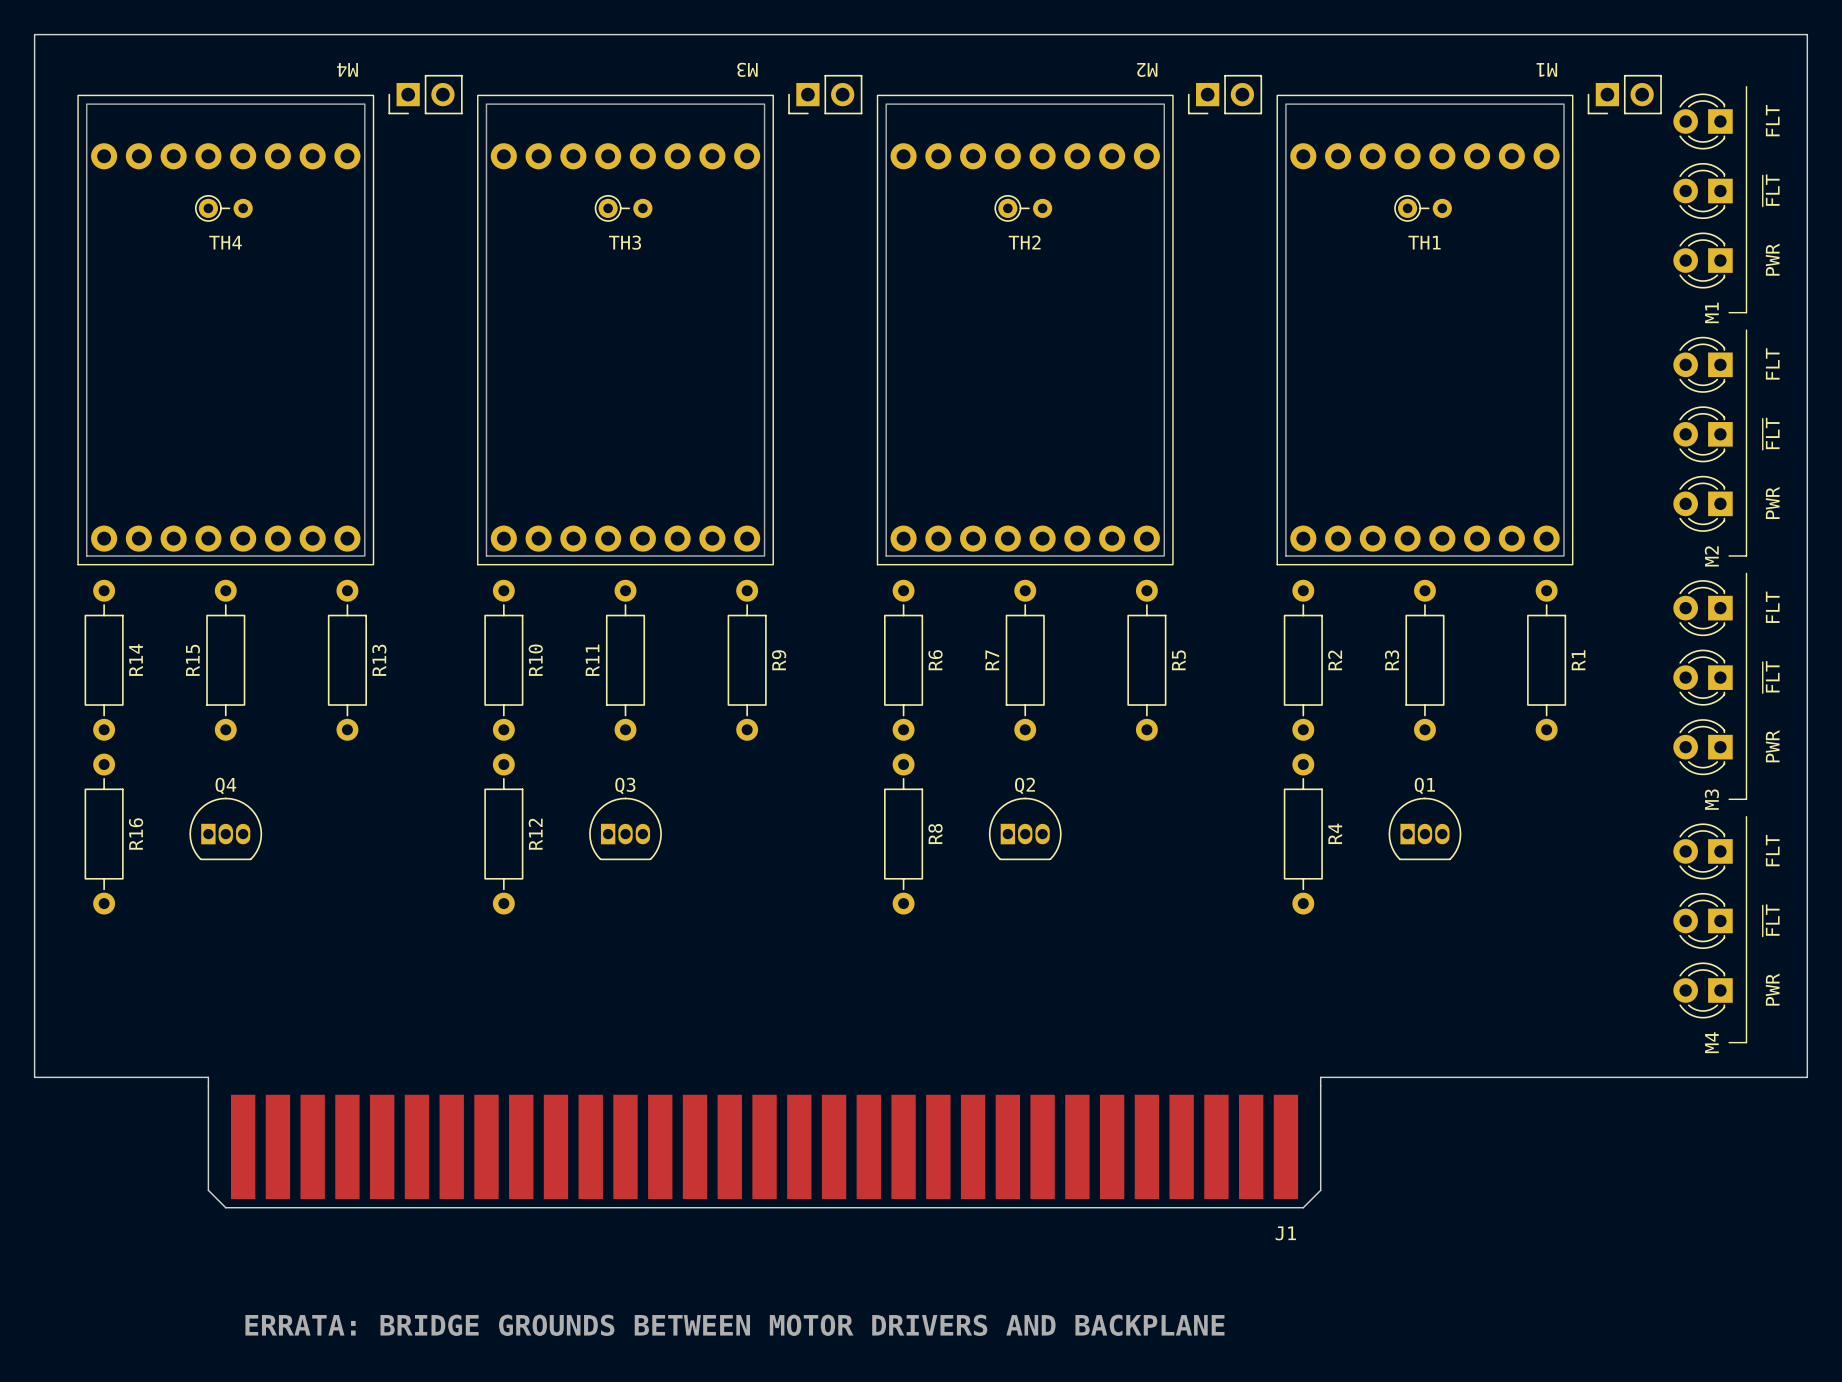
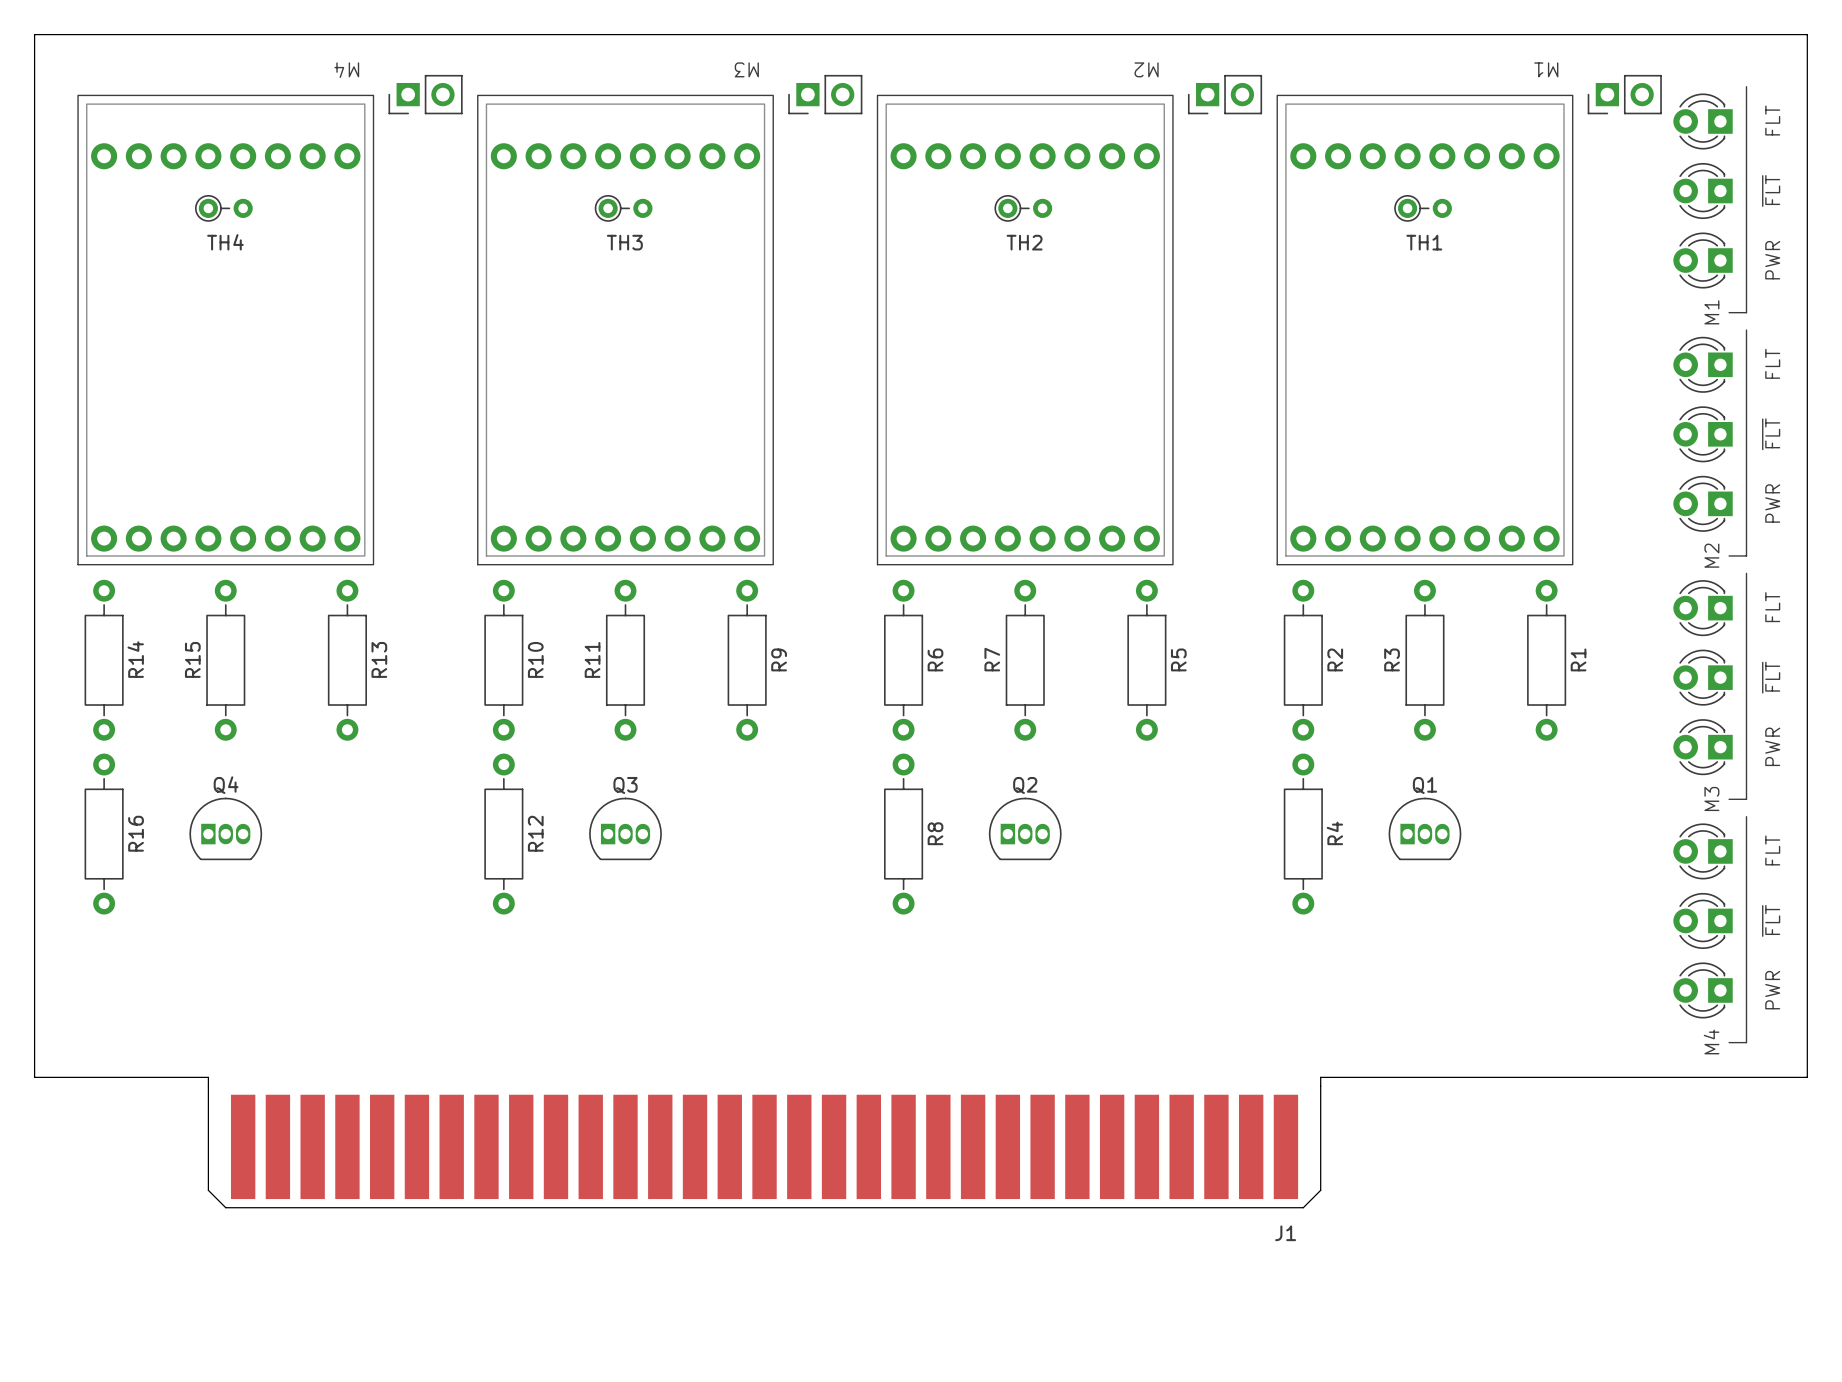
text: ERRATA: BRIDGE GROUNDS BETWEEN MOTOR DRIVERS AND BACKPLANE (734, 1325) -> none

